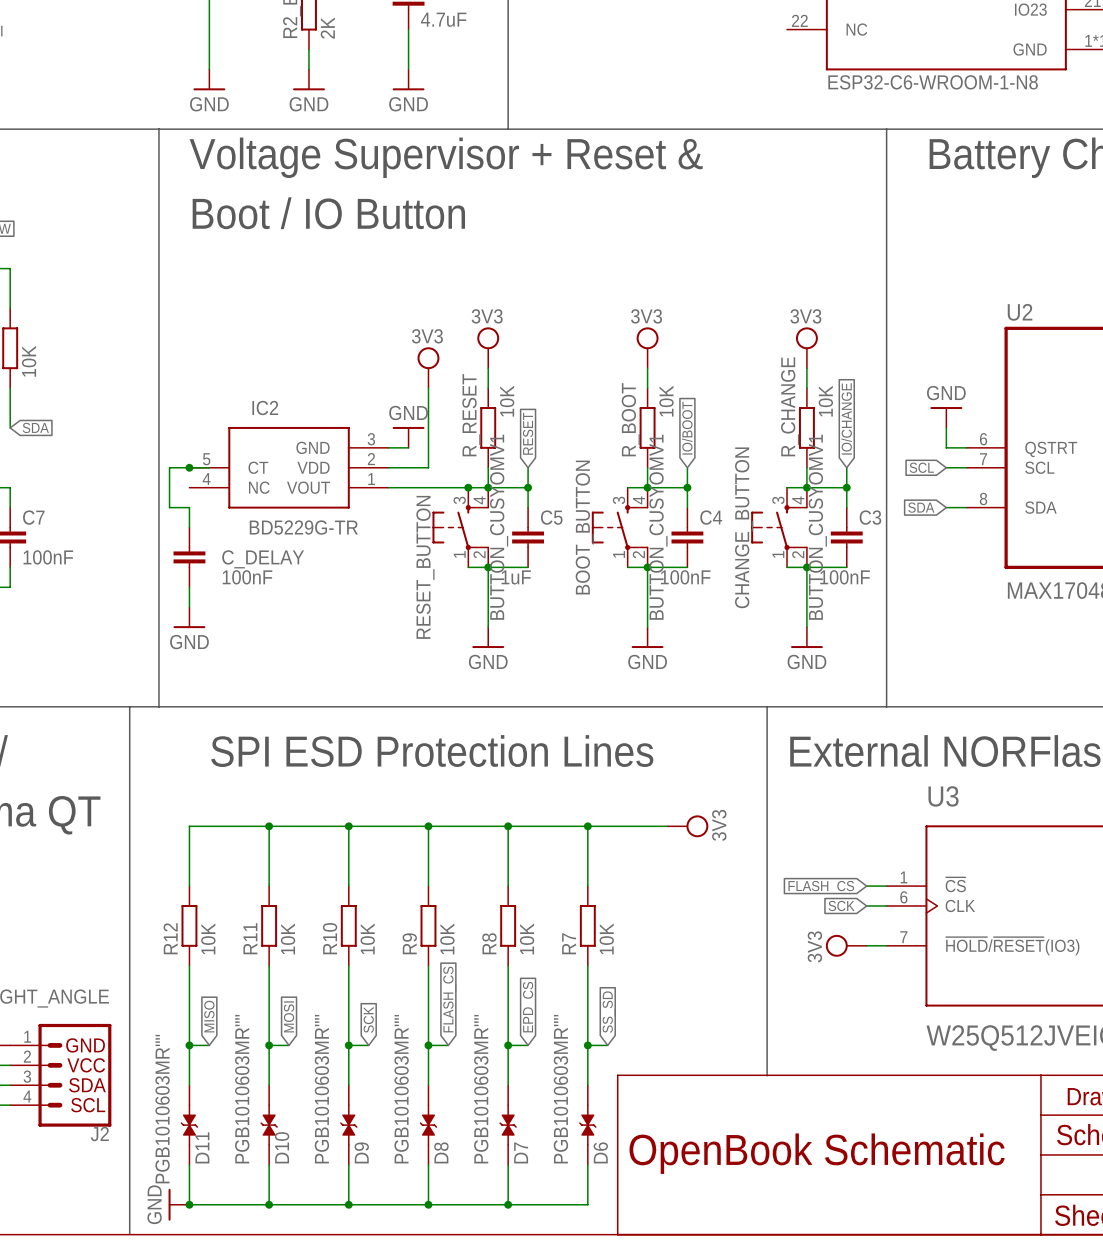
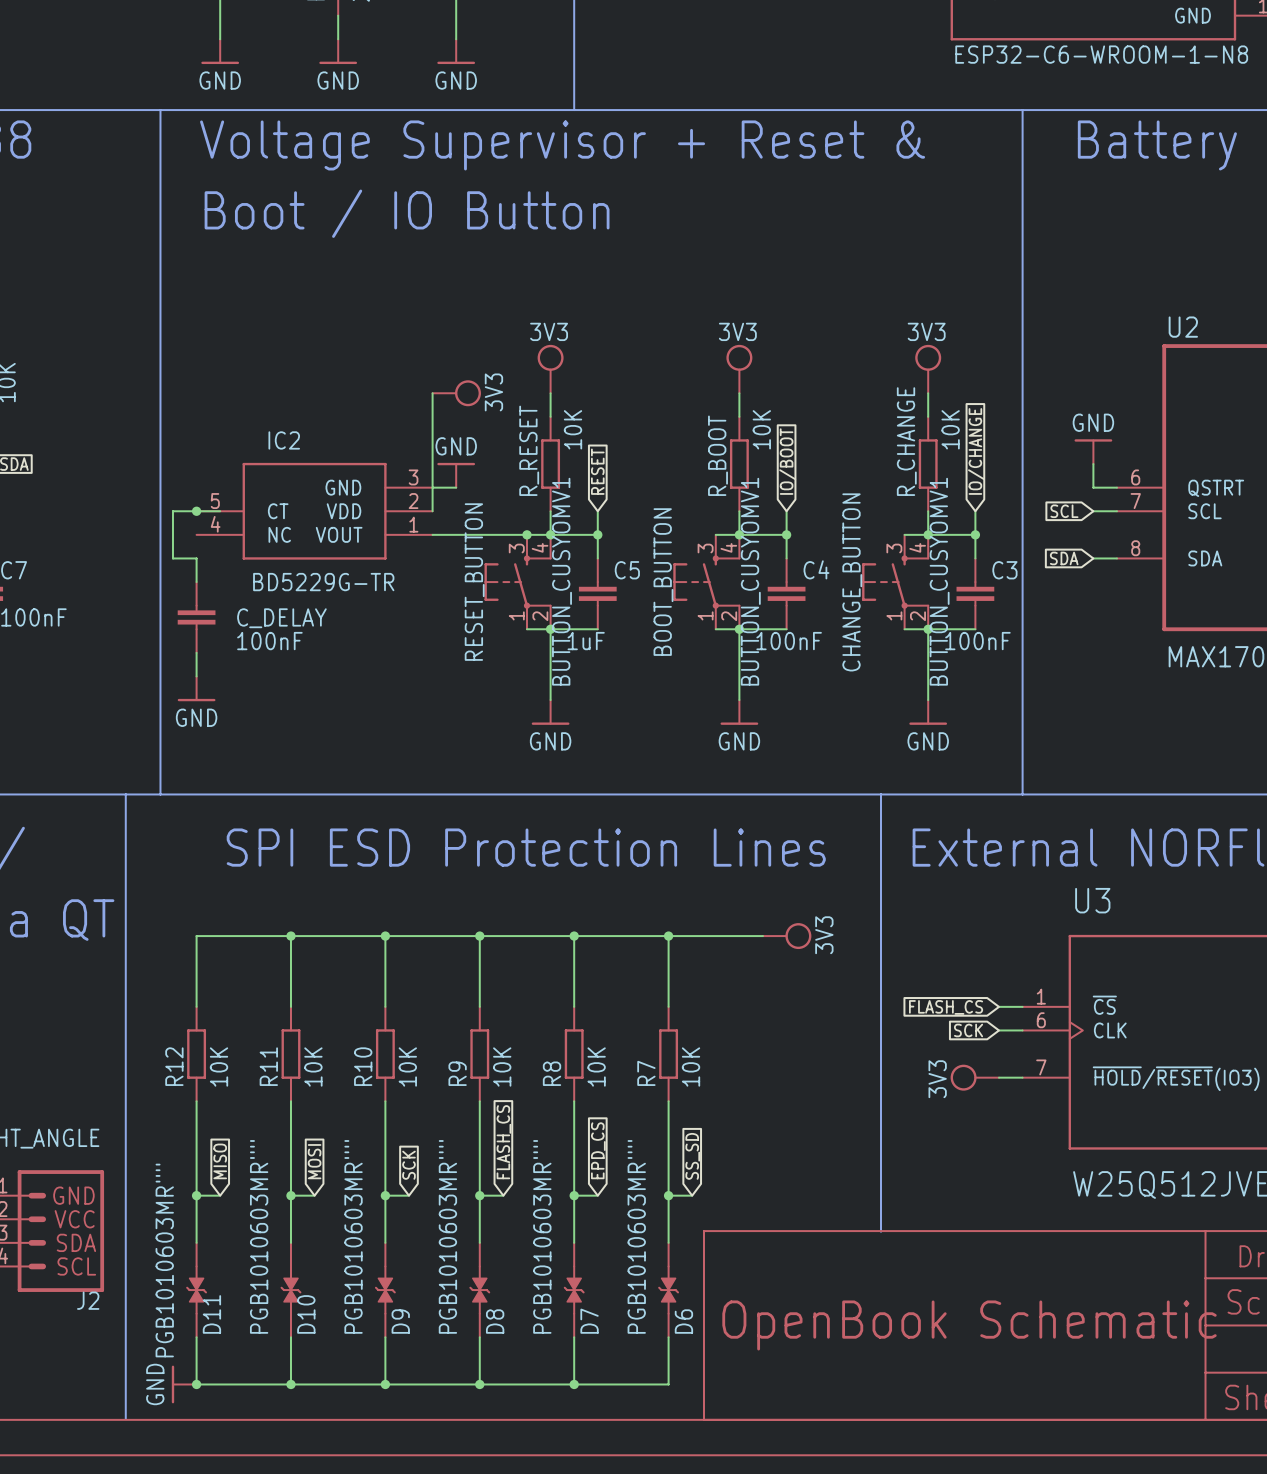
power symbol rotation: 0° (428, 358) -> 90° clockwise (467, 393)
wire: (428, 388) (428, 467) (388, 467) -> (432, 393) (432, 511)
RESET_BUTTON name position: RESET_BUTTON (425, 567) -> RESET_BUTTON (474, 582)

